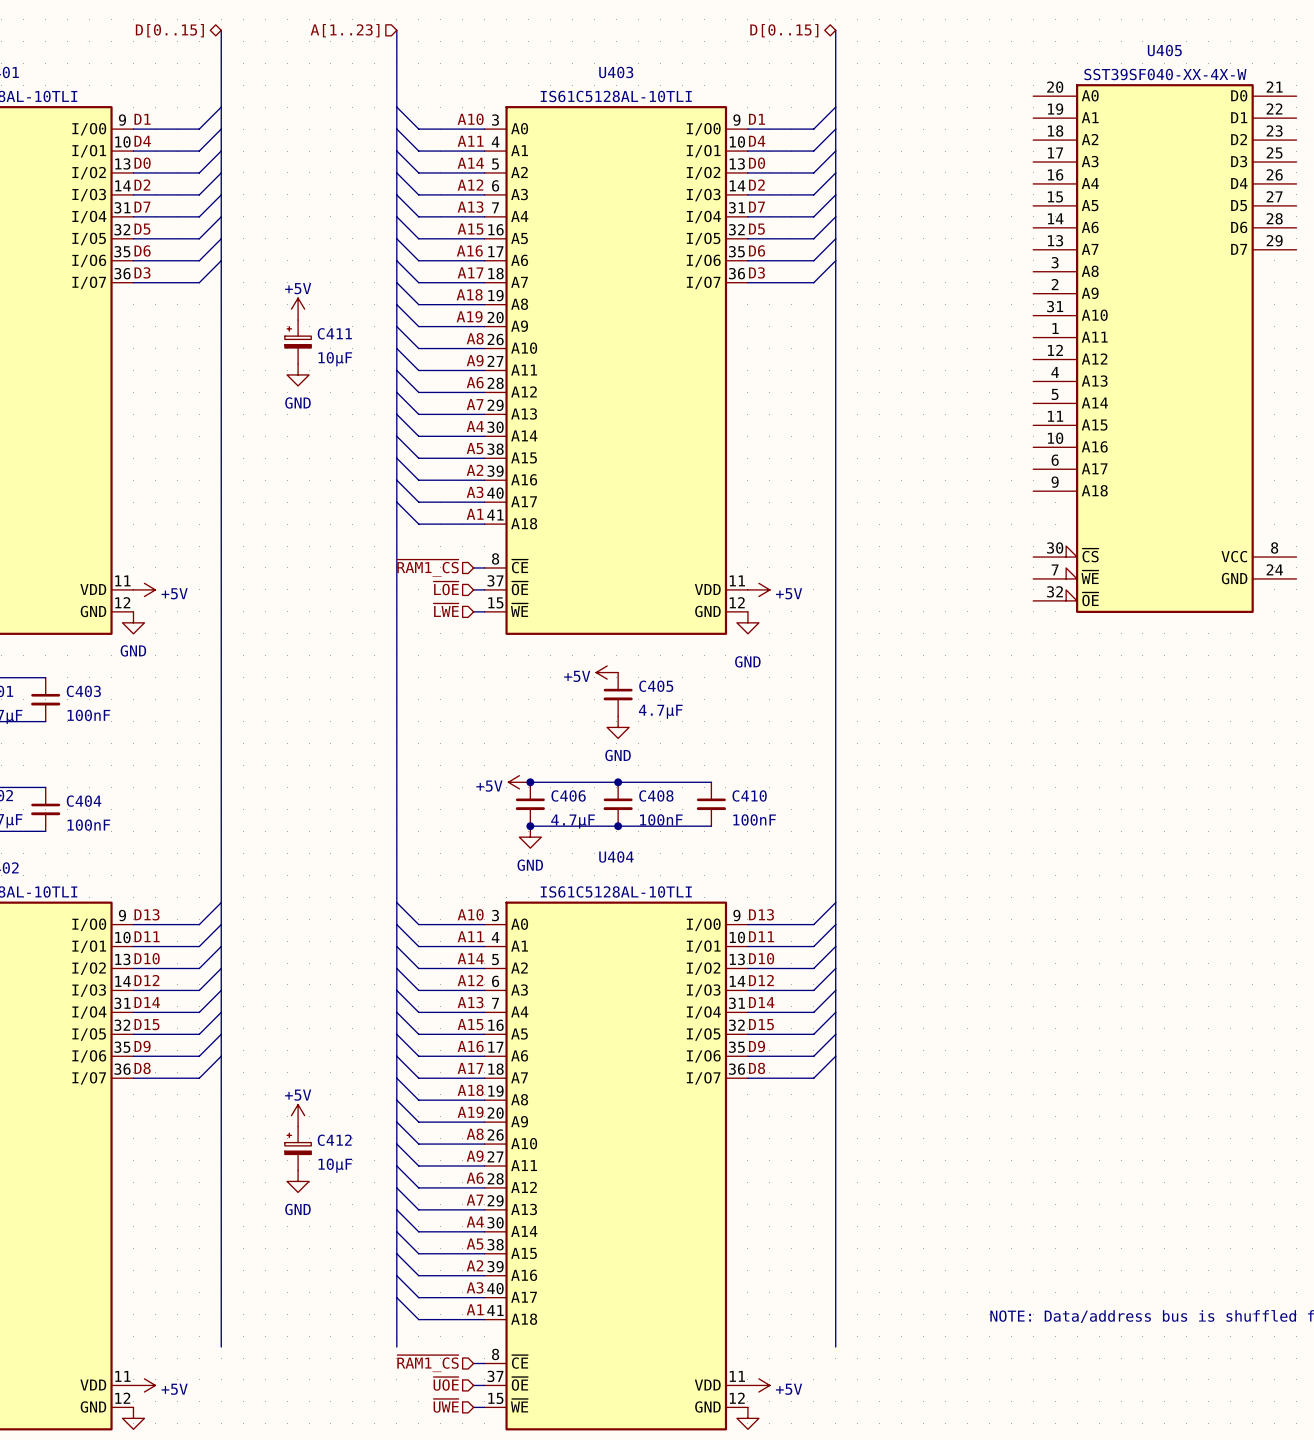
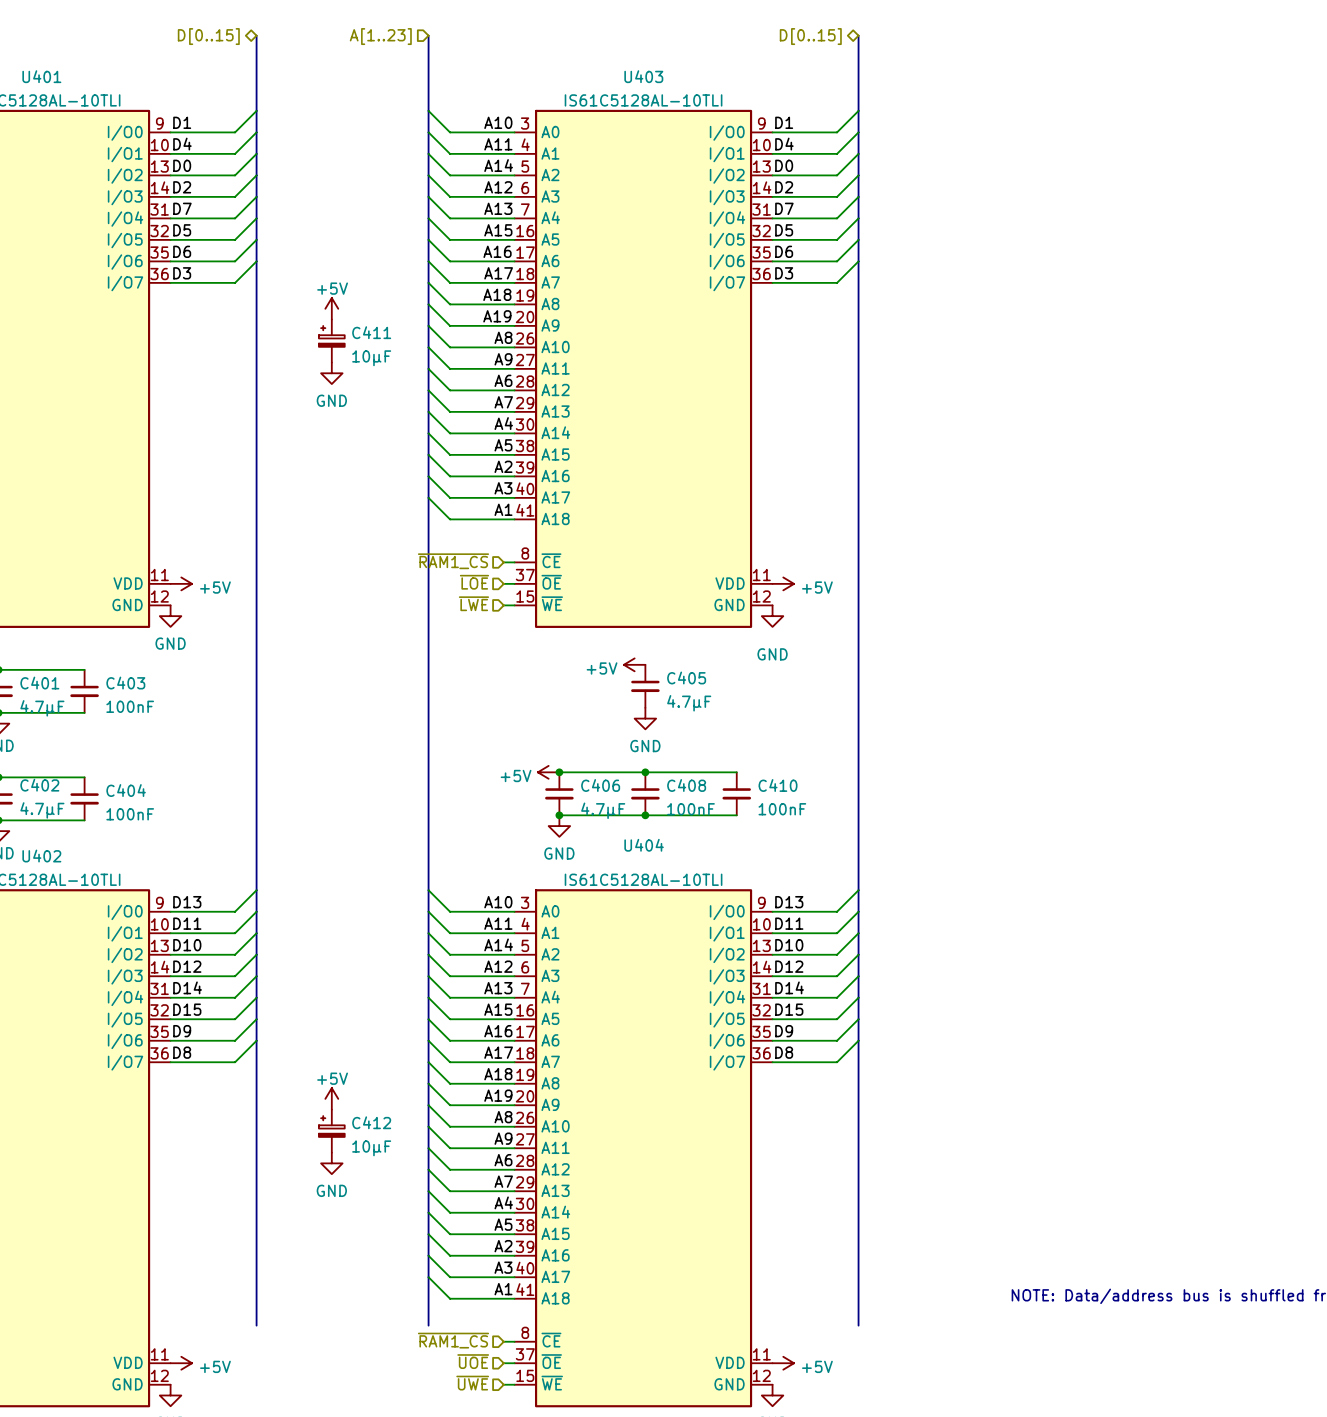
U405: SST39SF040-XX-4X-W (1164, 348) -> none

